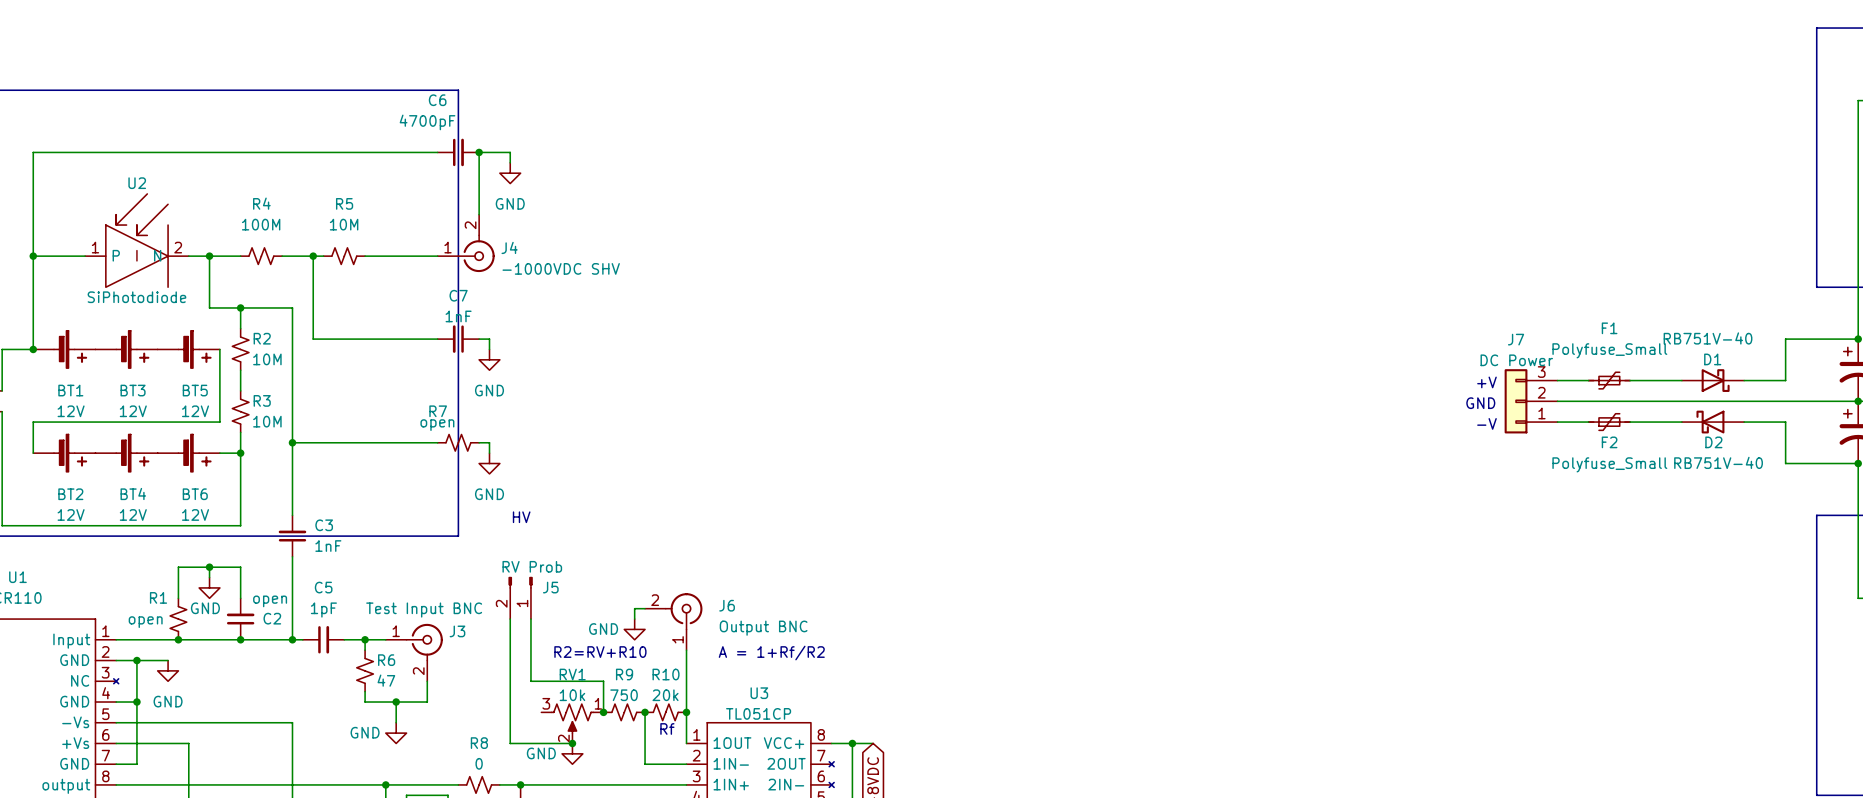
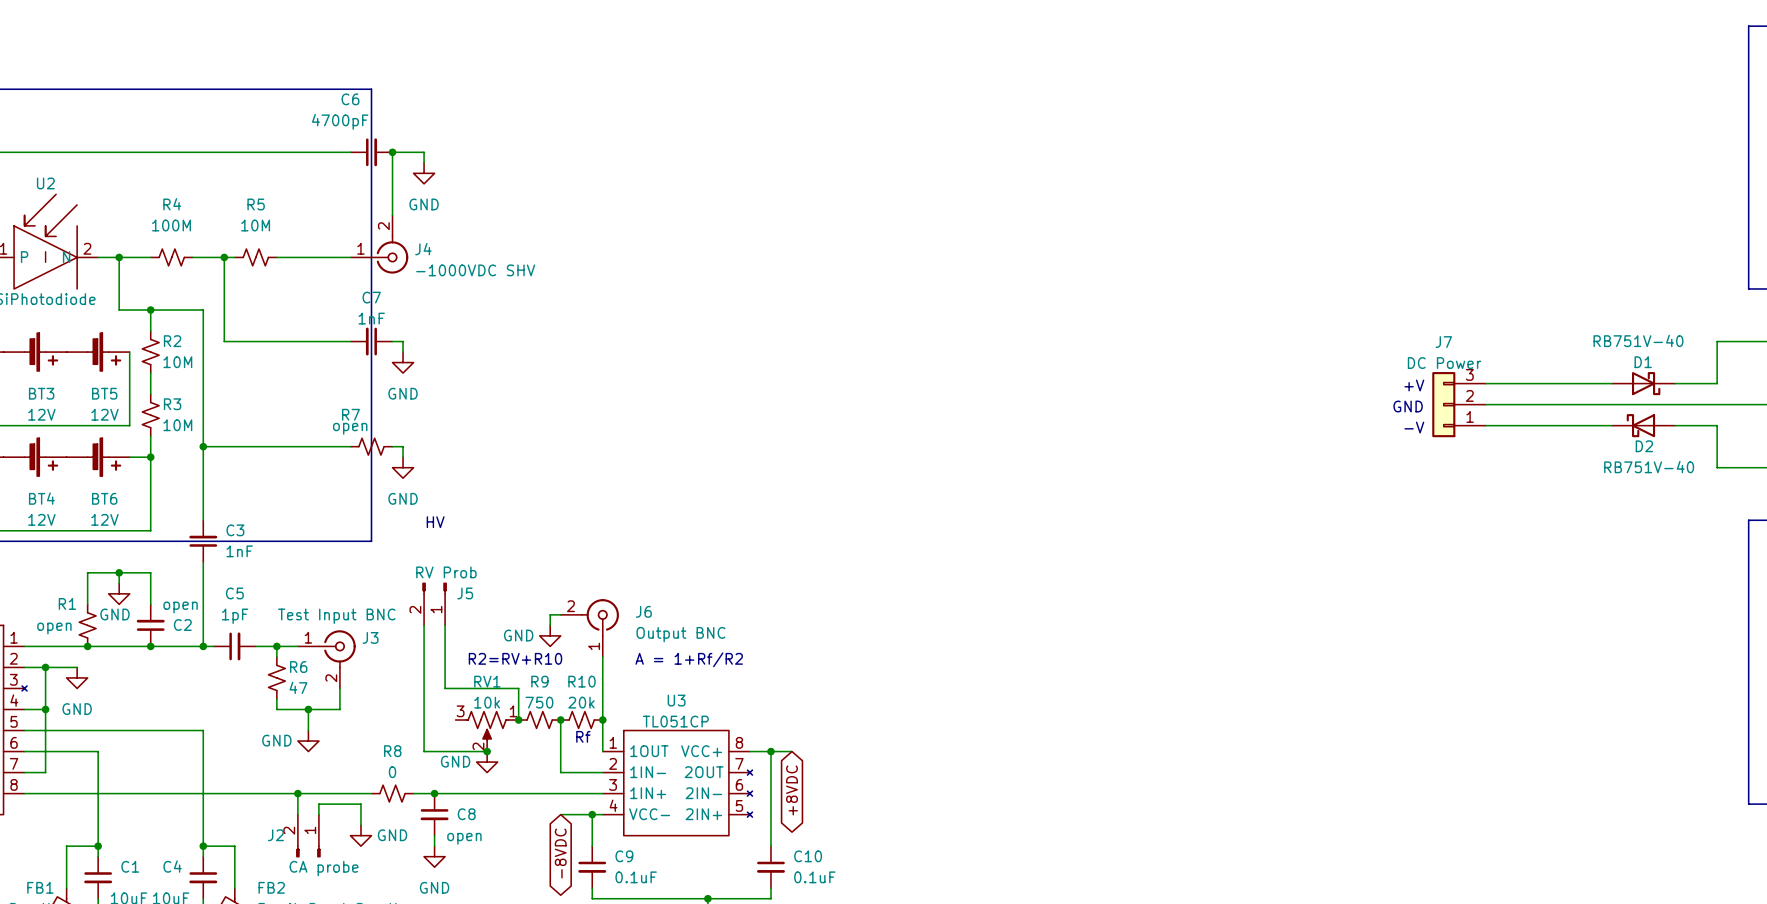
F1: Polyfuse_Small (1609, 380) -> none
F2: Polyfuse_Small (1609, 422) -> none

